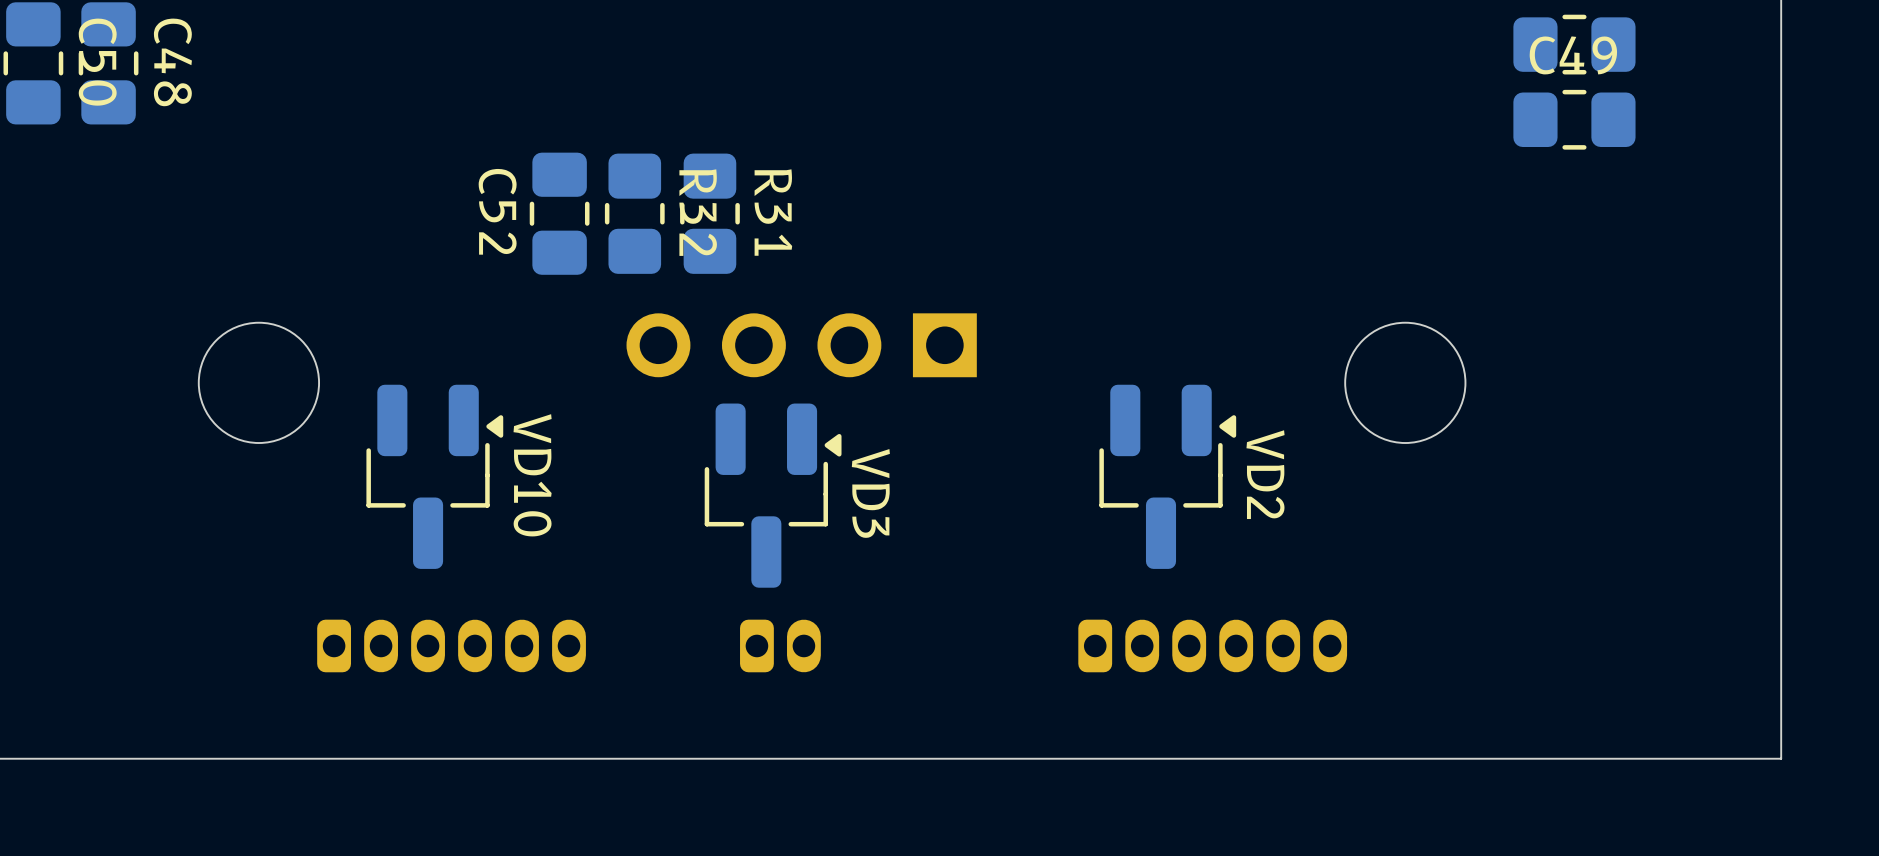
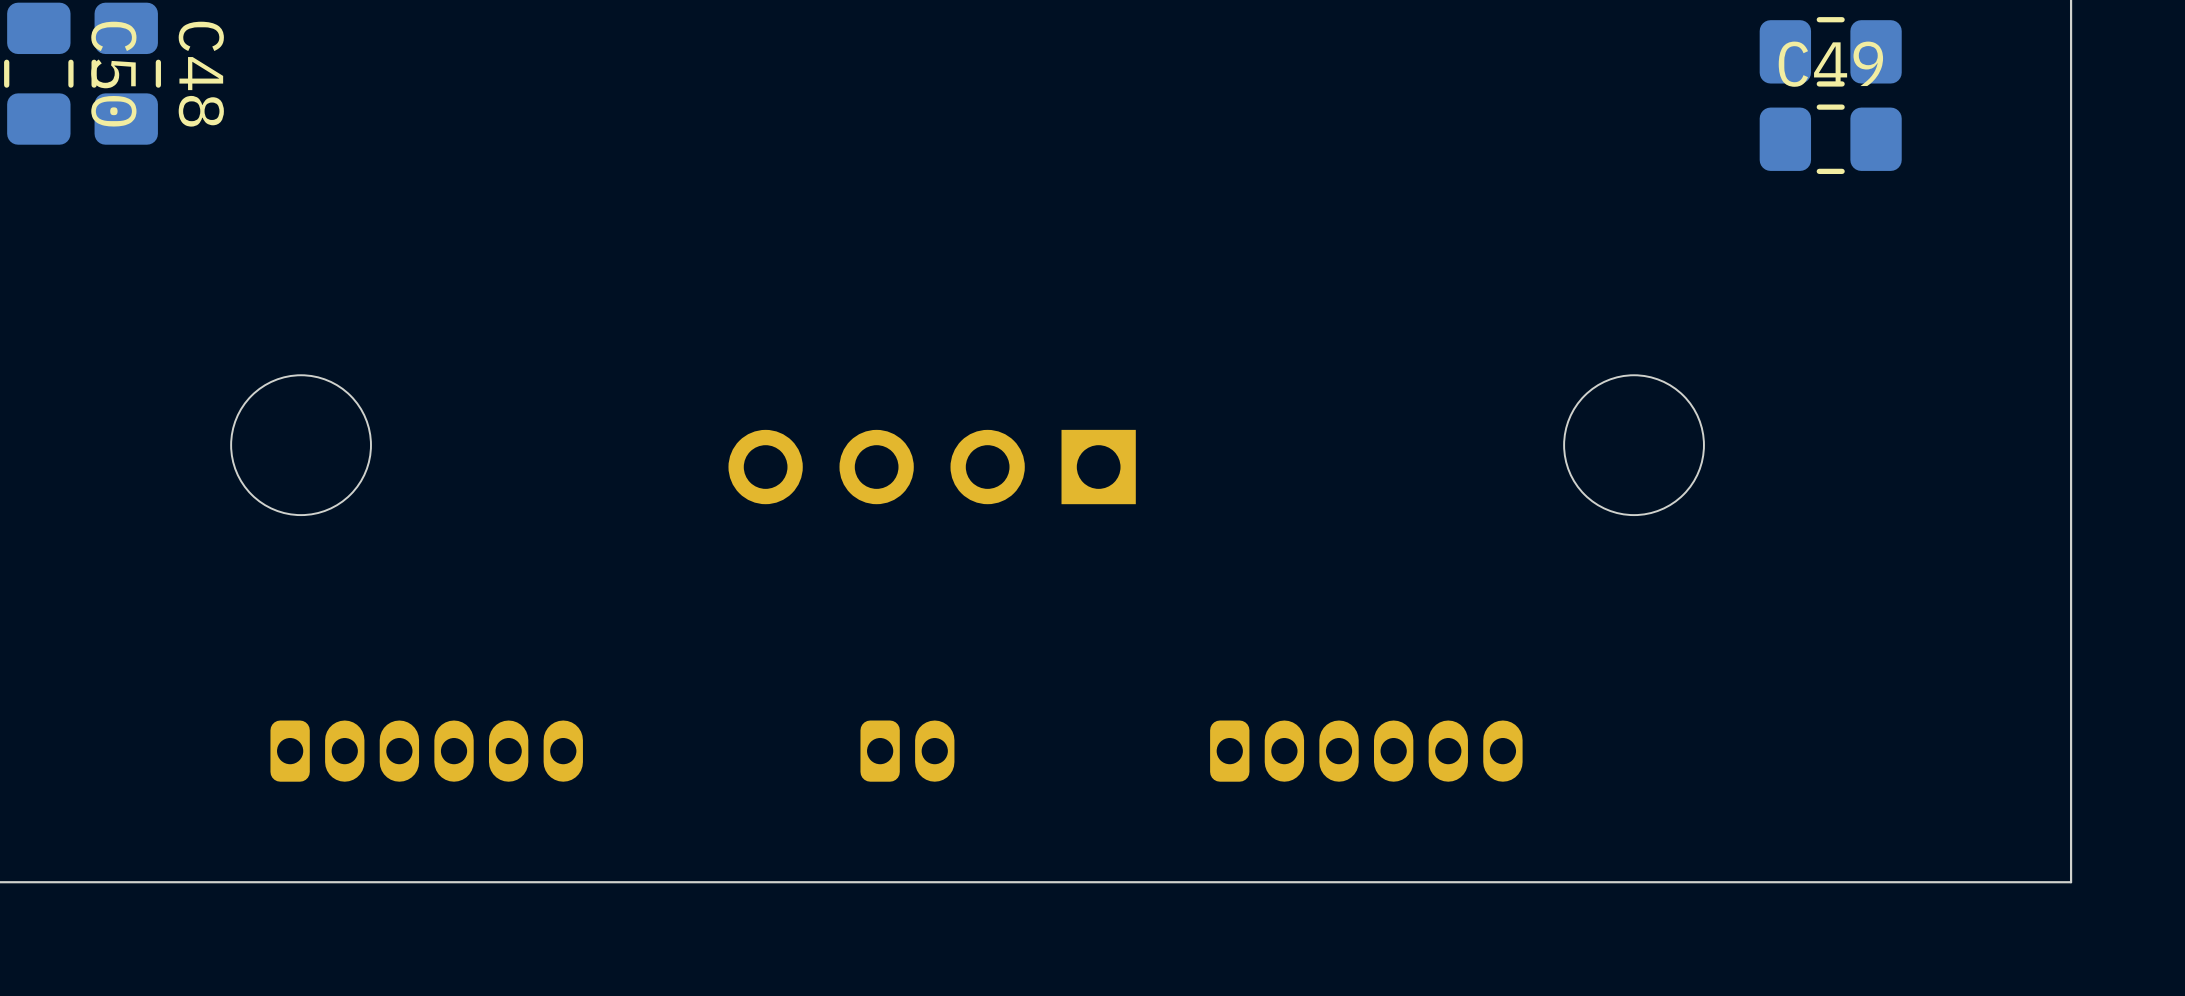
C52: (559, 213) -> none
R32: (634, 213) -> none
R31: (709, 213) -> none
part position: (801, 345) -> (932, 467)
VD10: (434, 476) -> none
VD2: (1167, 476) -> none
VD3: (773, 495) -> none
part position: (451, 645) -> (426, 751)
part position: (1212, 645) -> (1366, 751)

